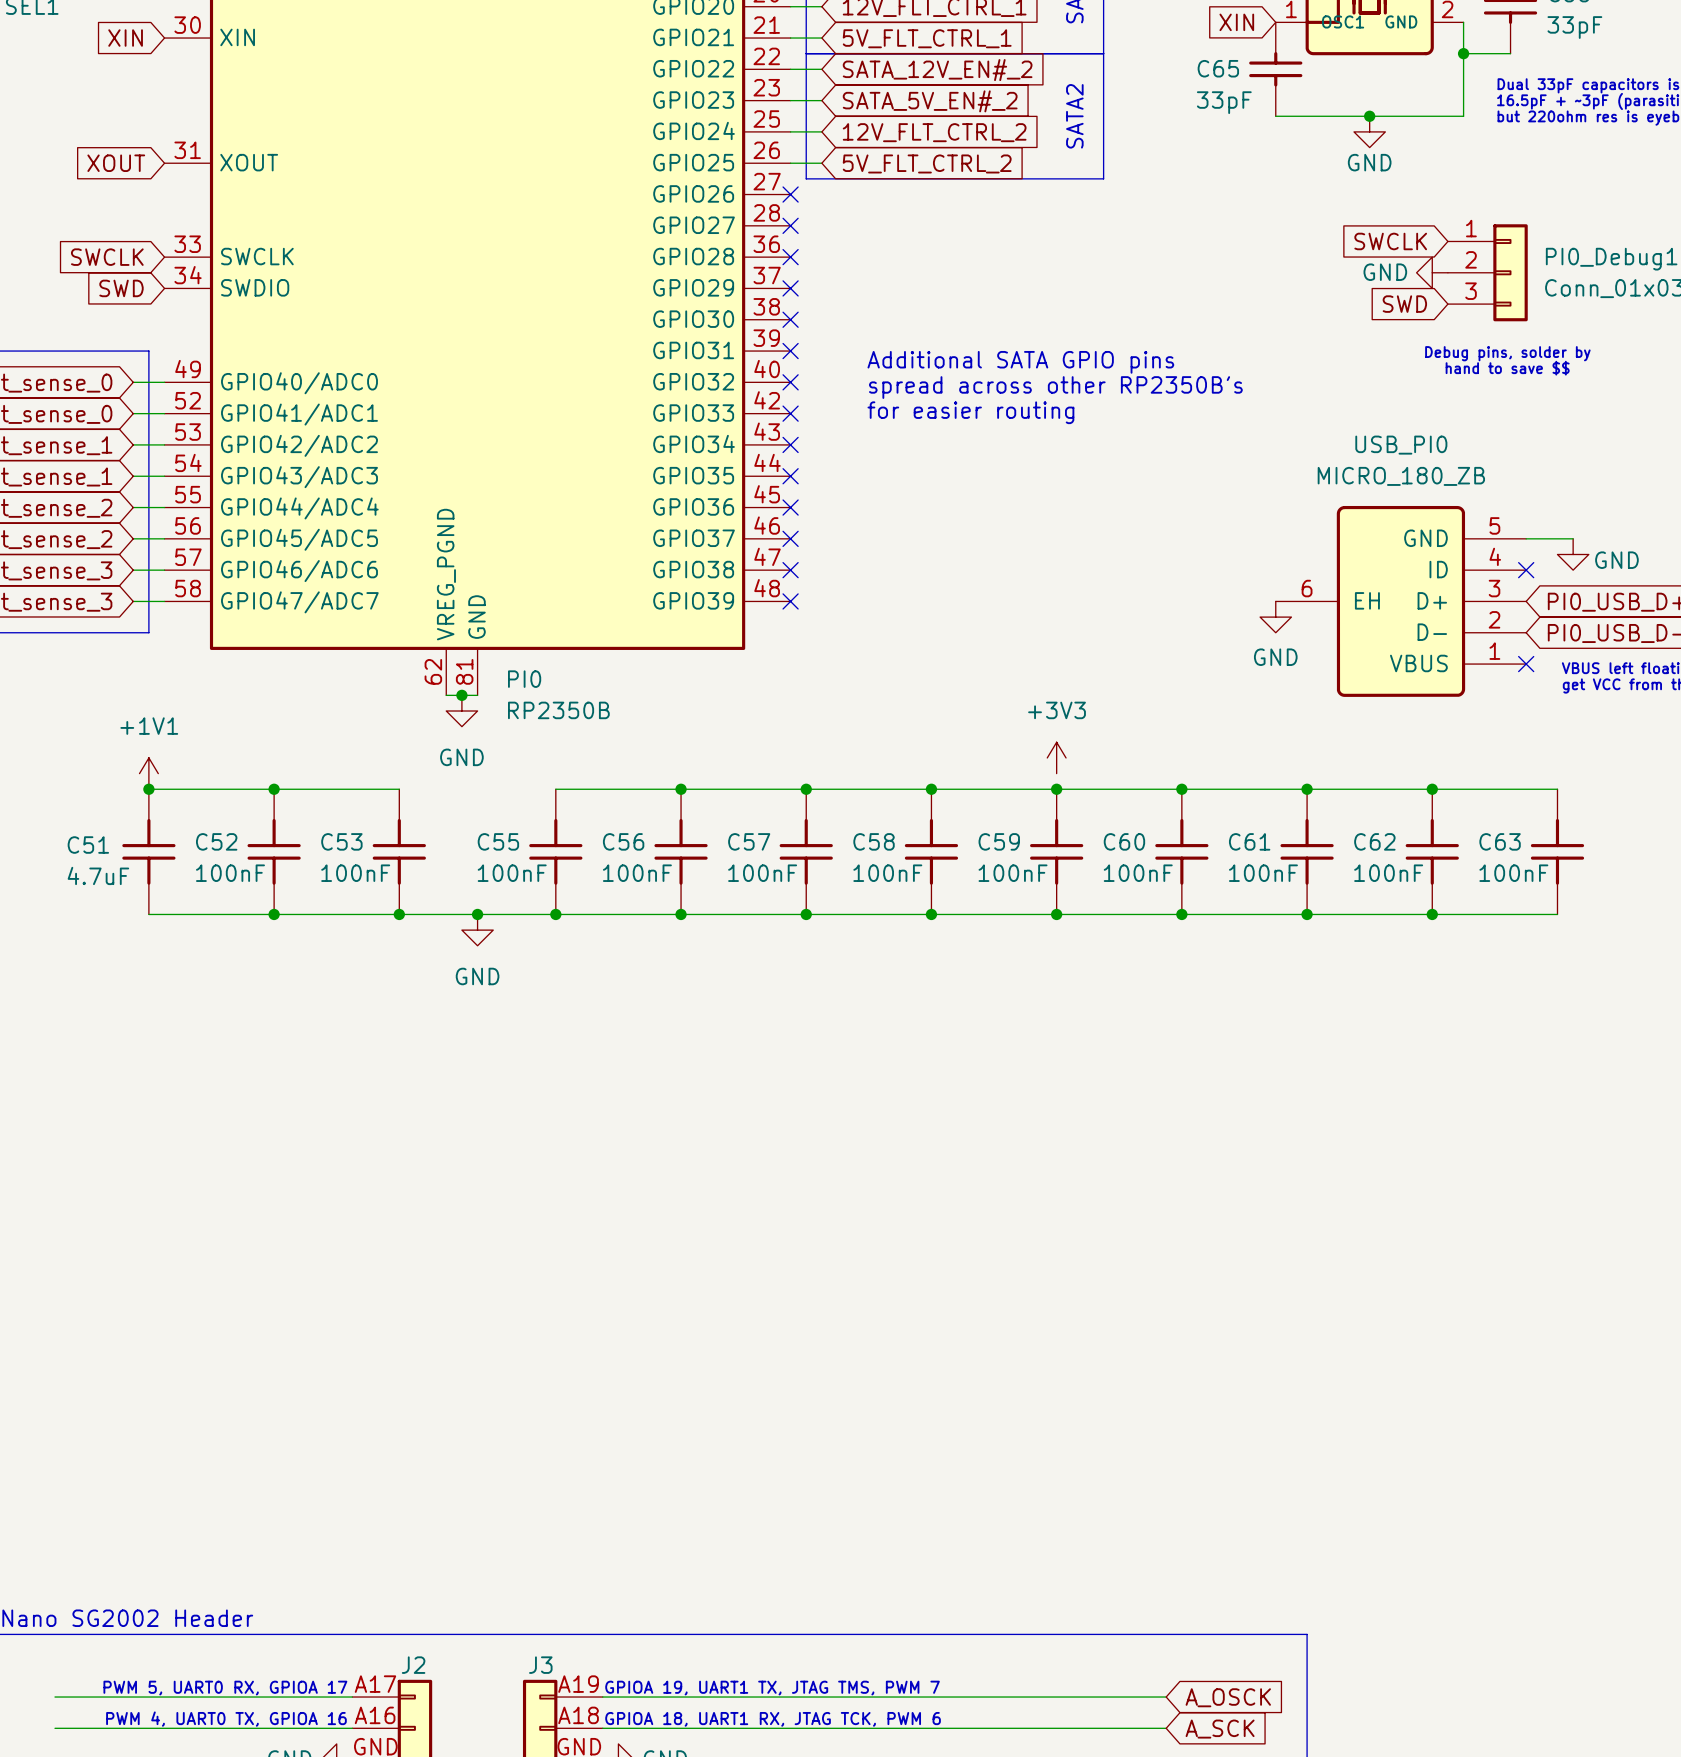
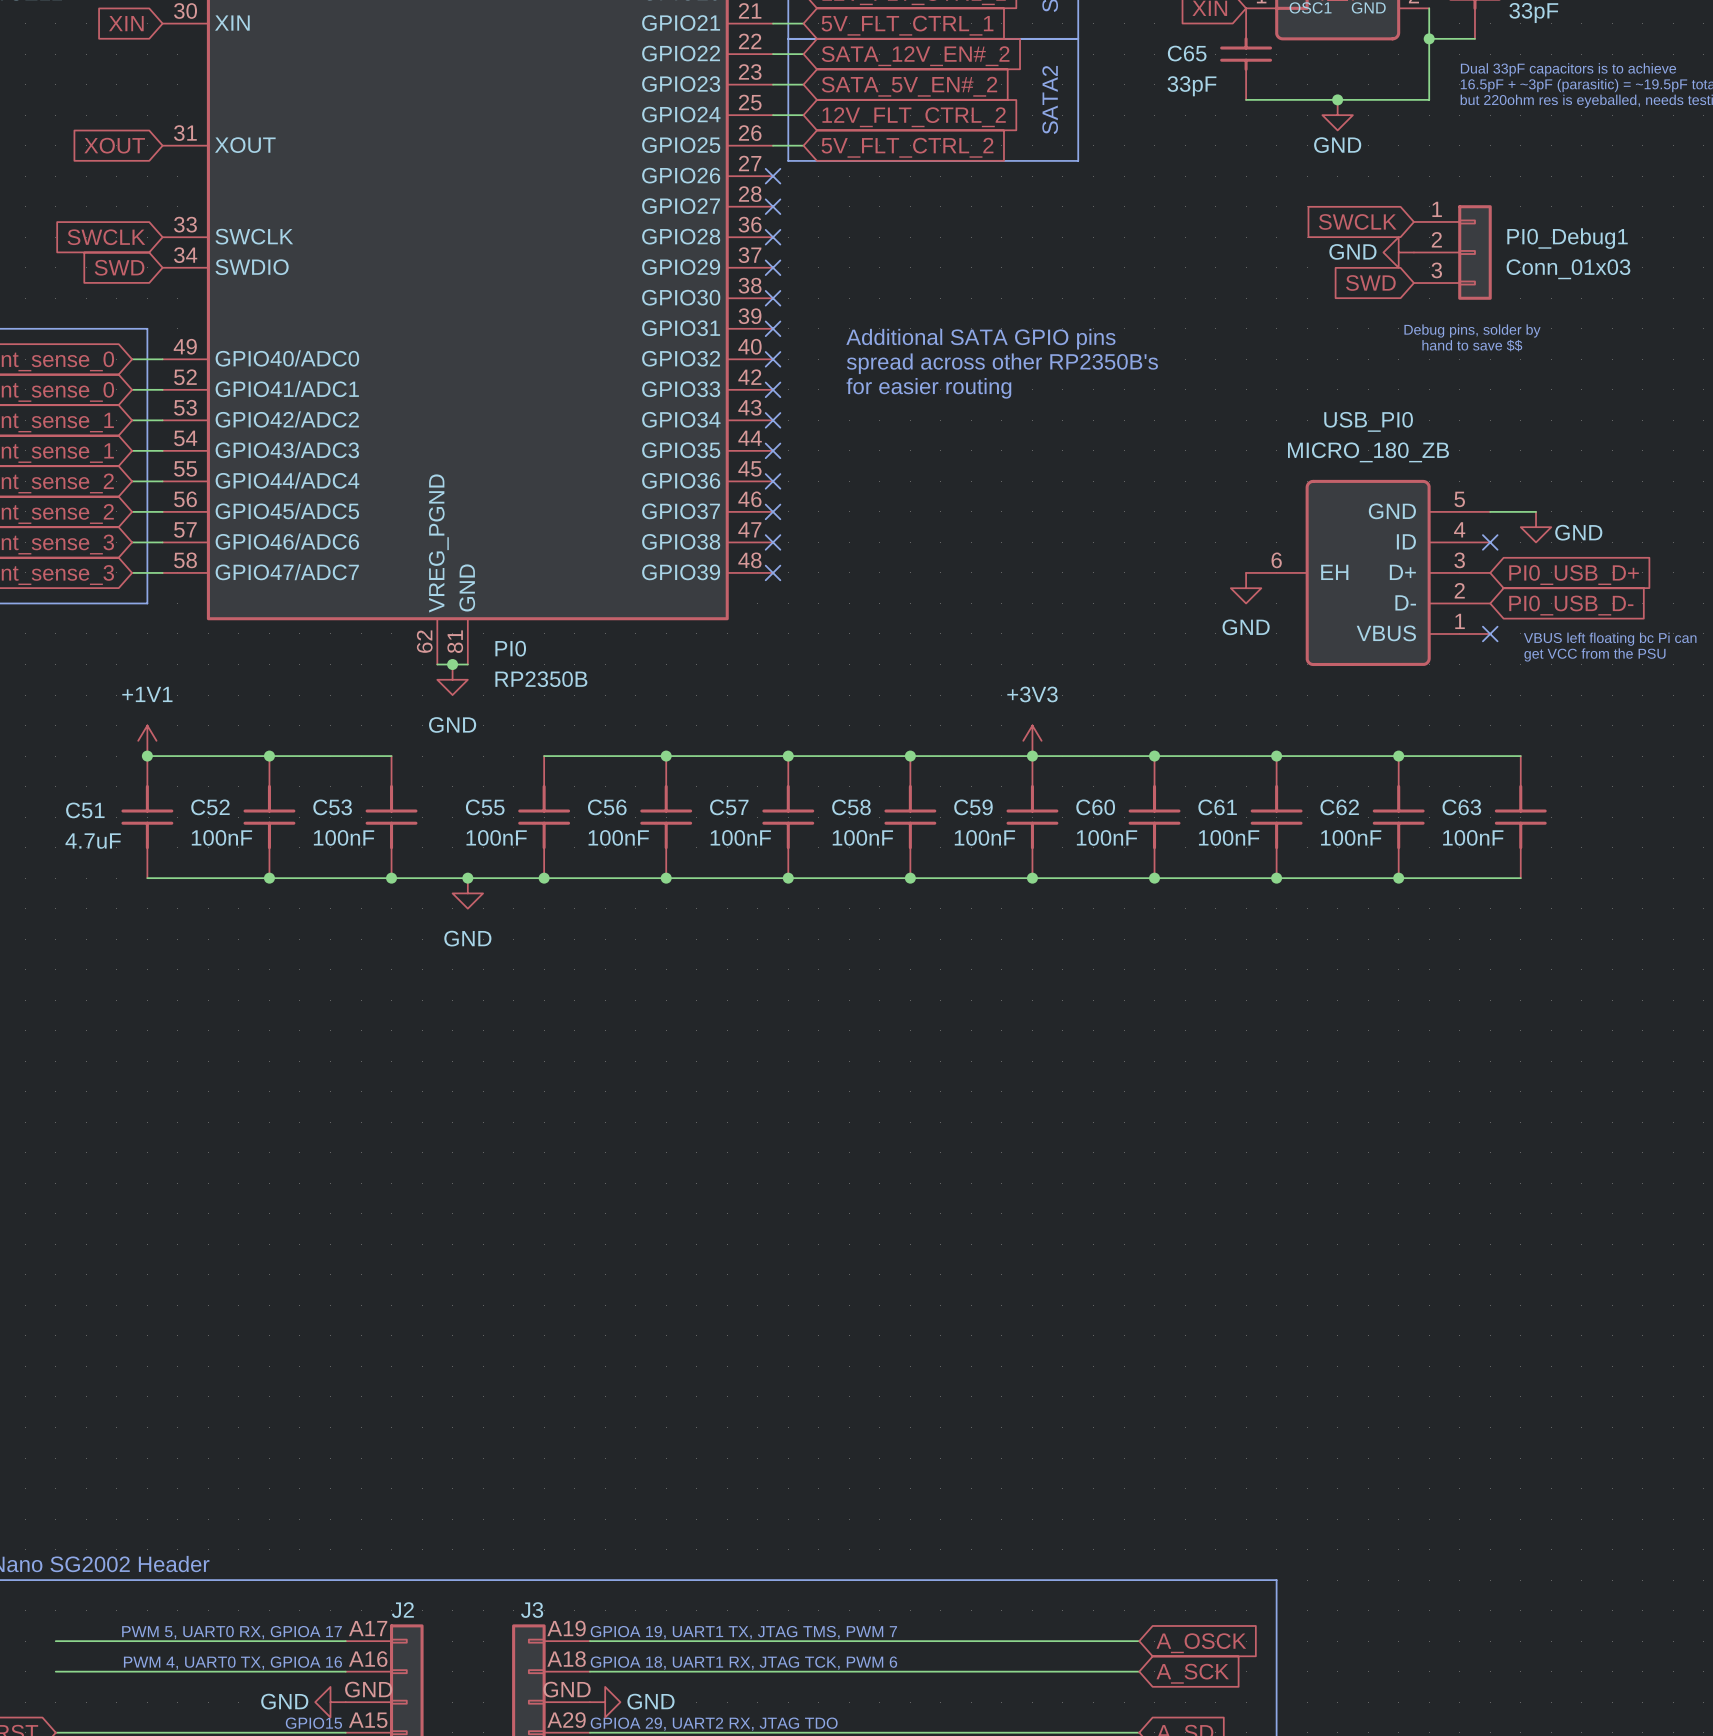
power symbol position: +3V3 (1056, 757) -> +3V3 (1032, 740)

